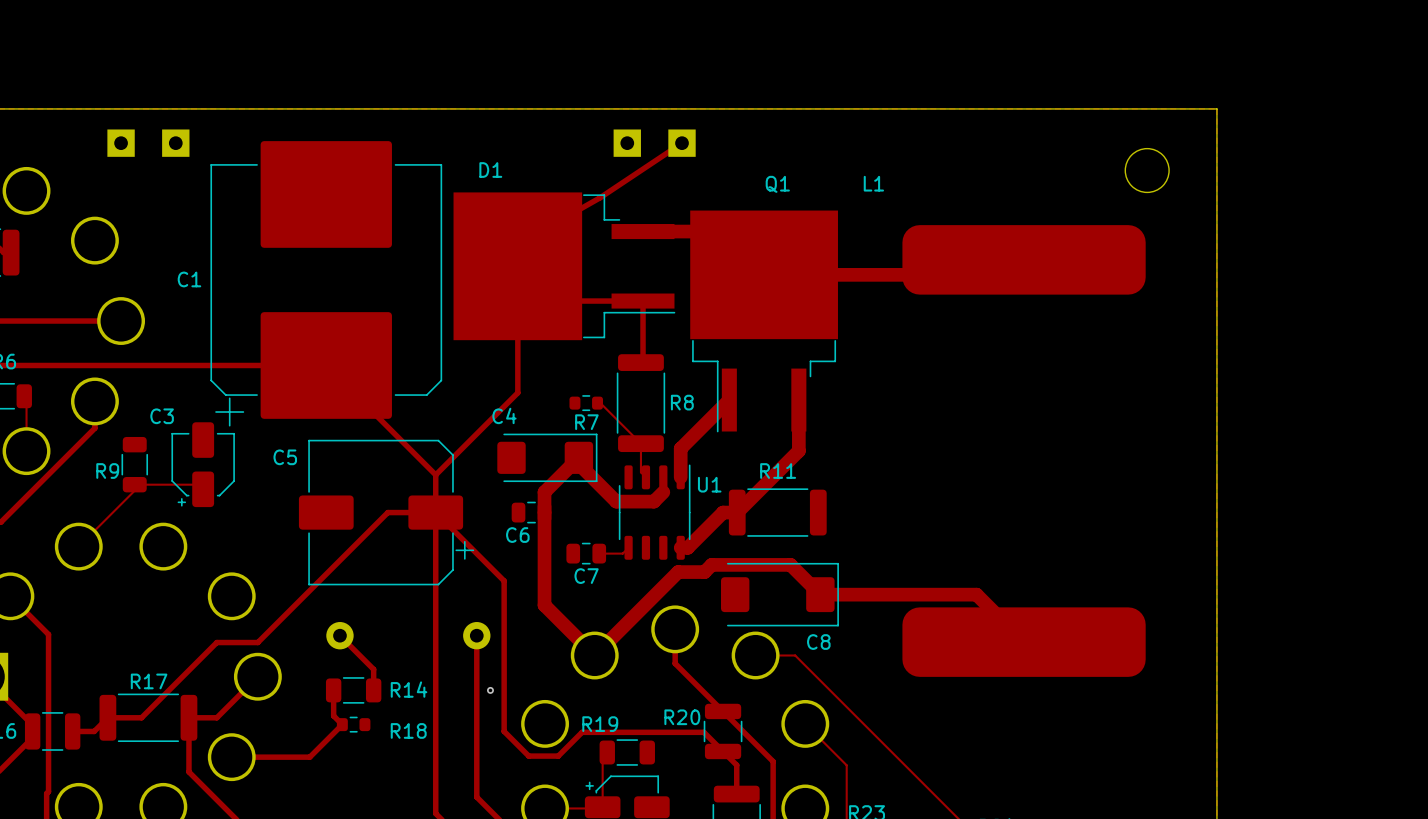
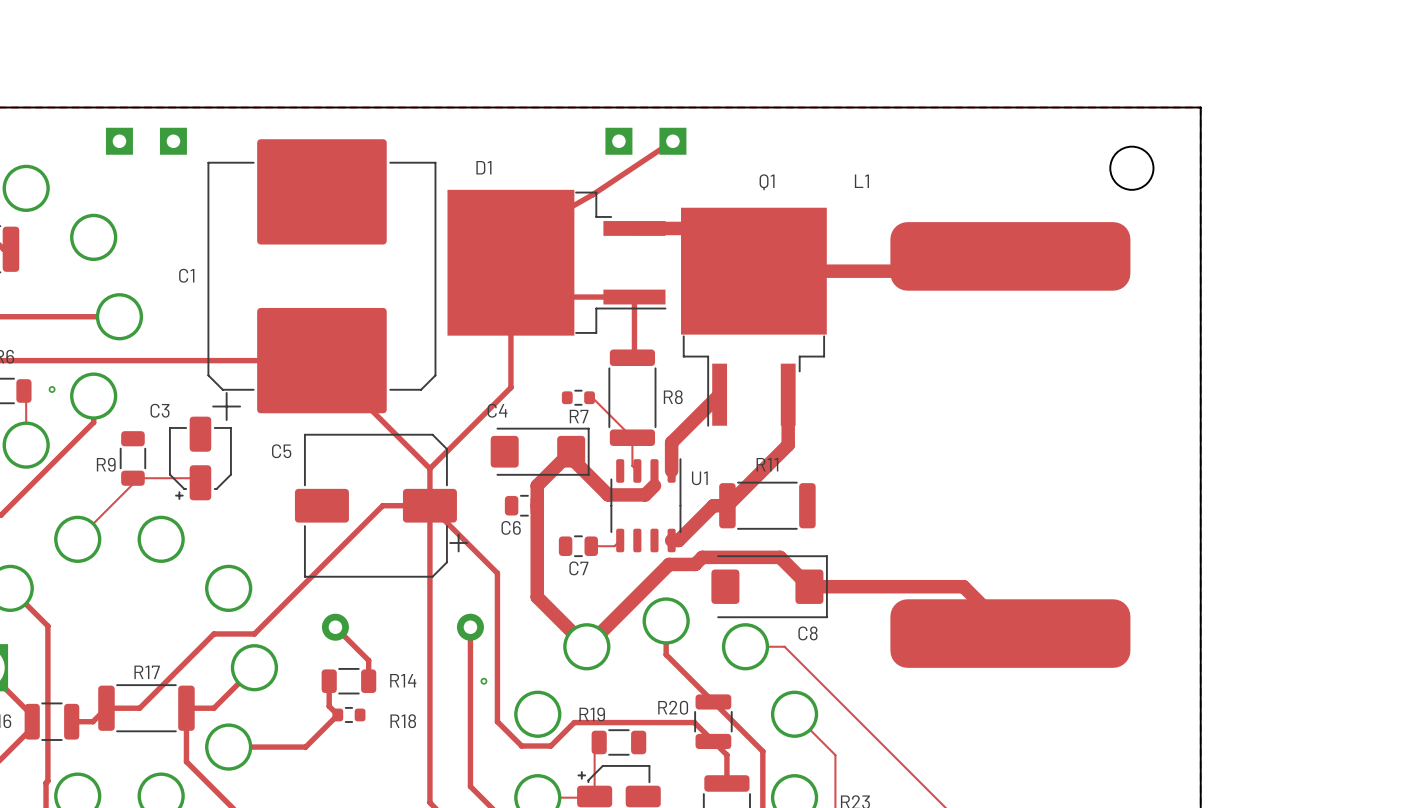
via: none -> (52, 389)

